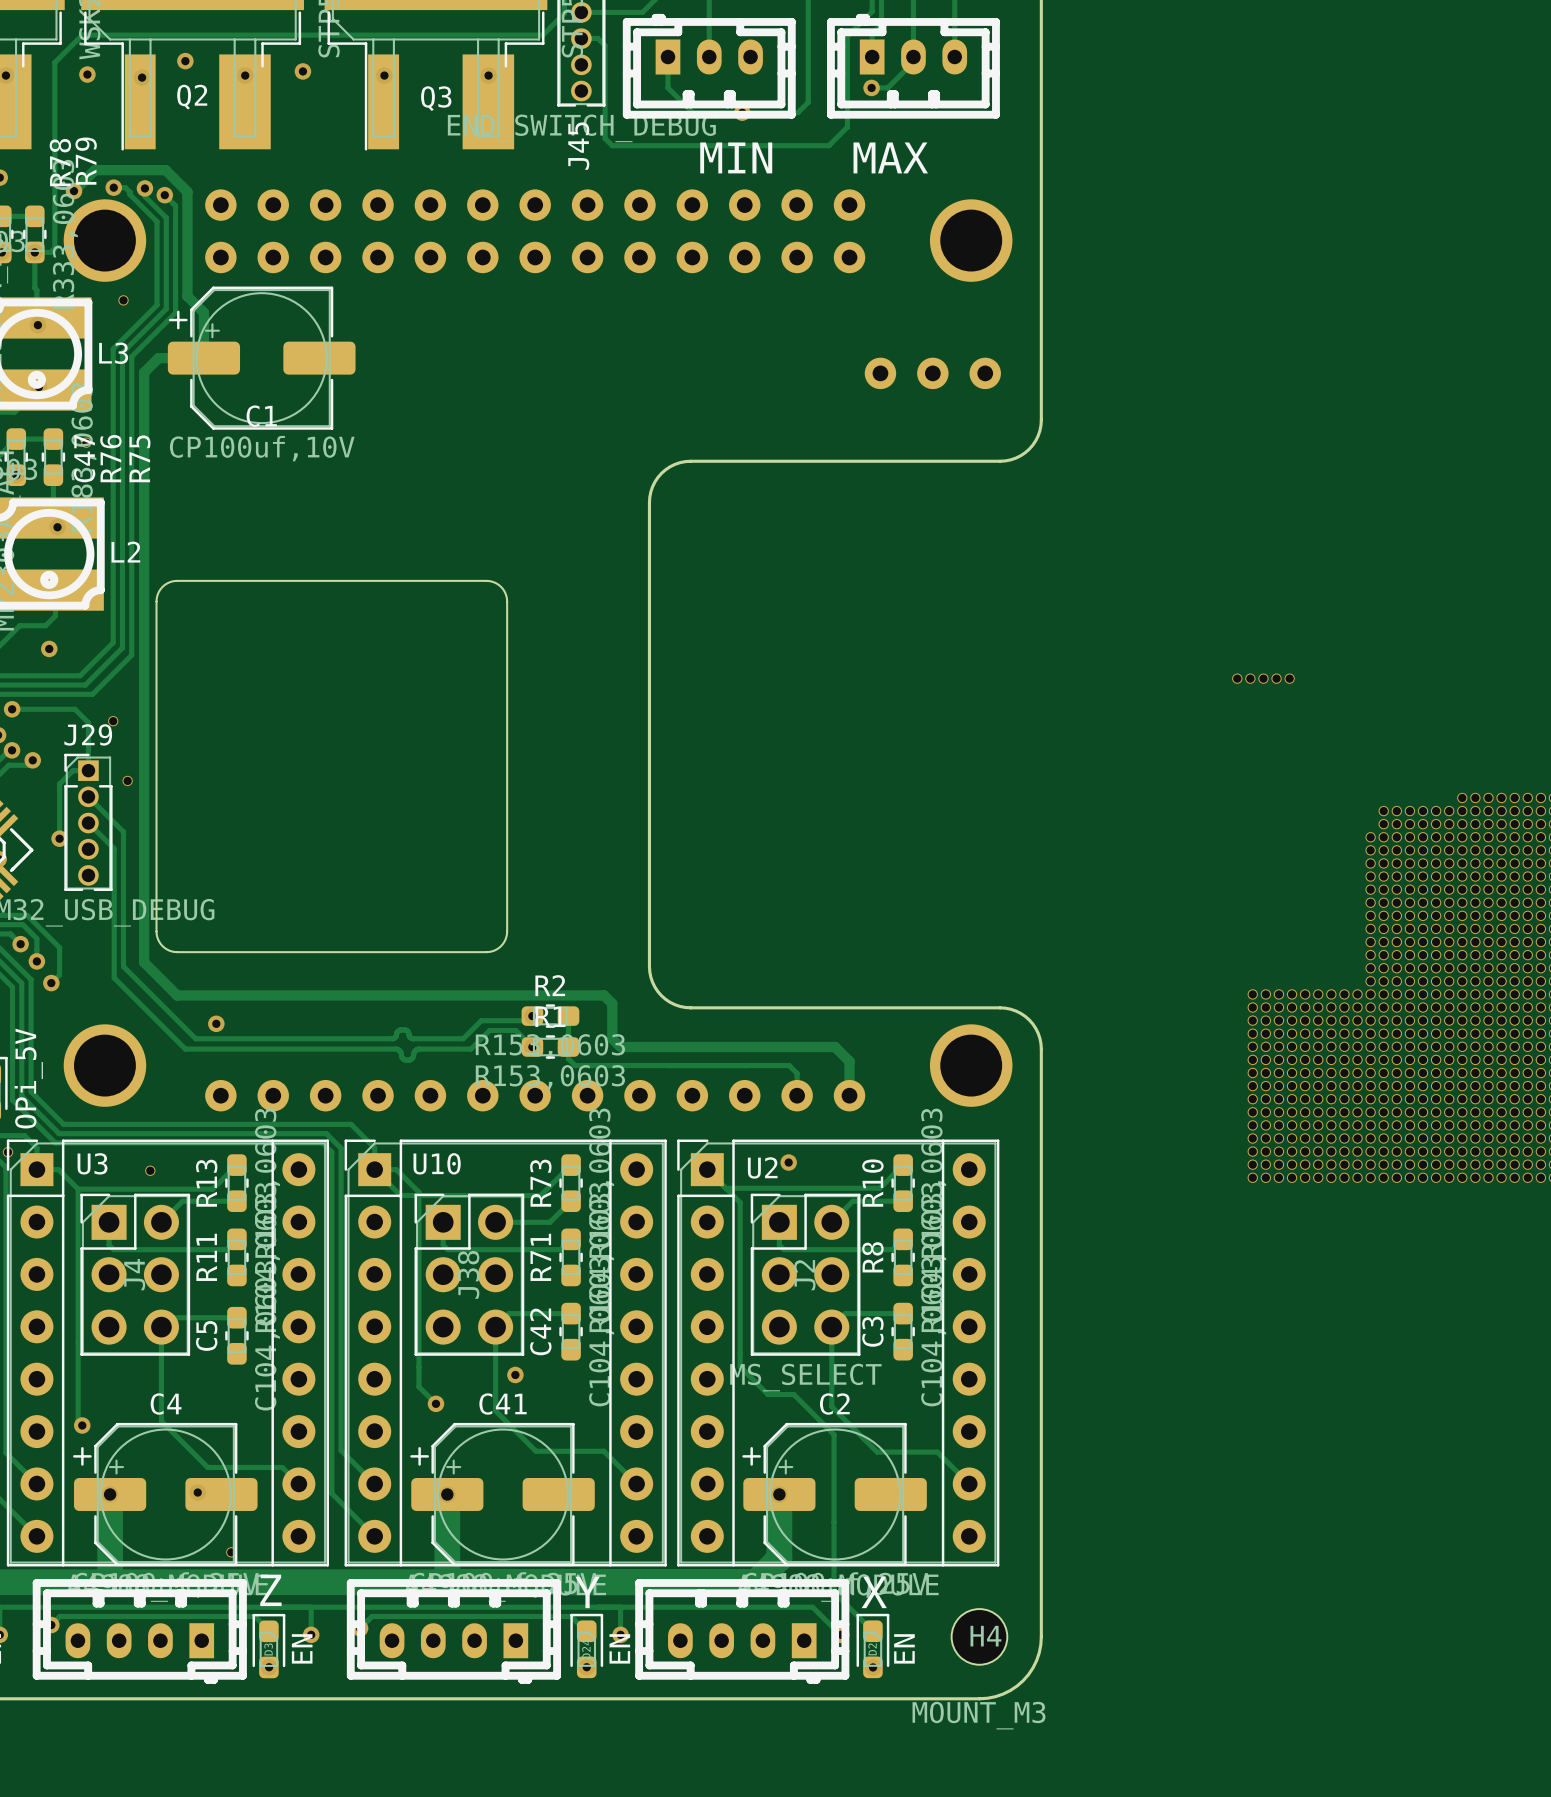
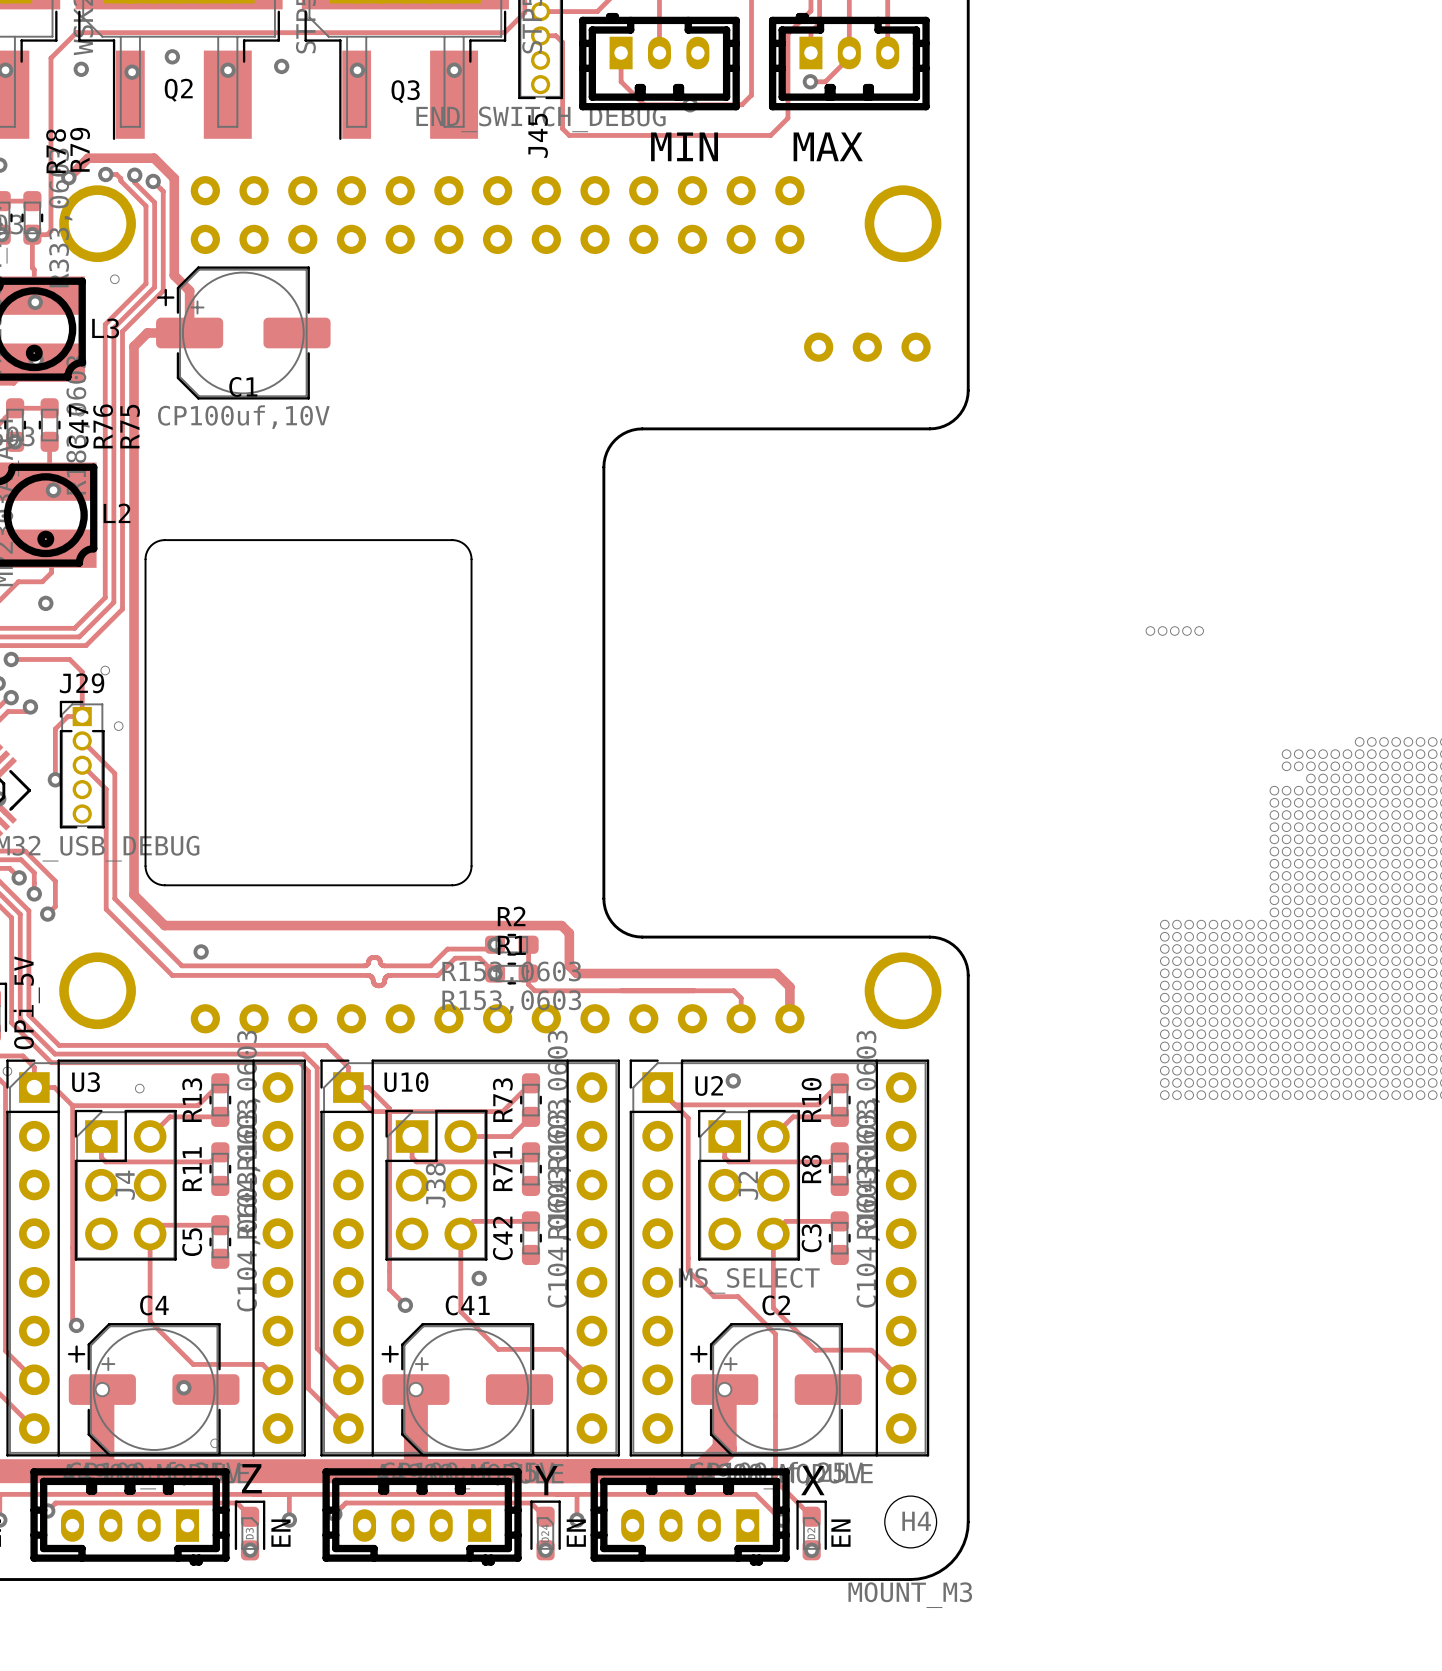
via: (1370, 837) -> none
via: (1383, 837) -> none
via: (1396, 837) -> none

